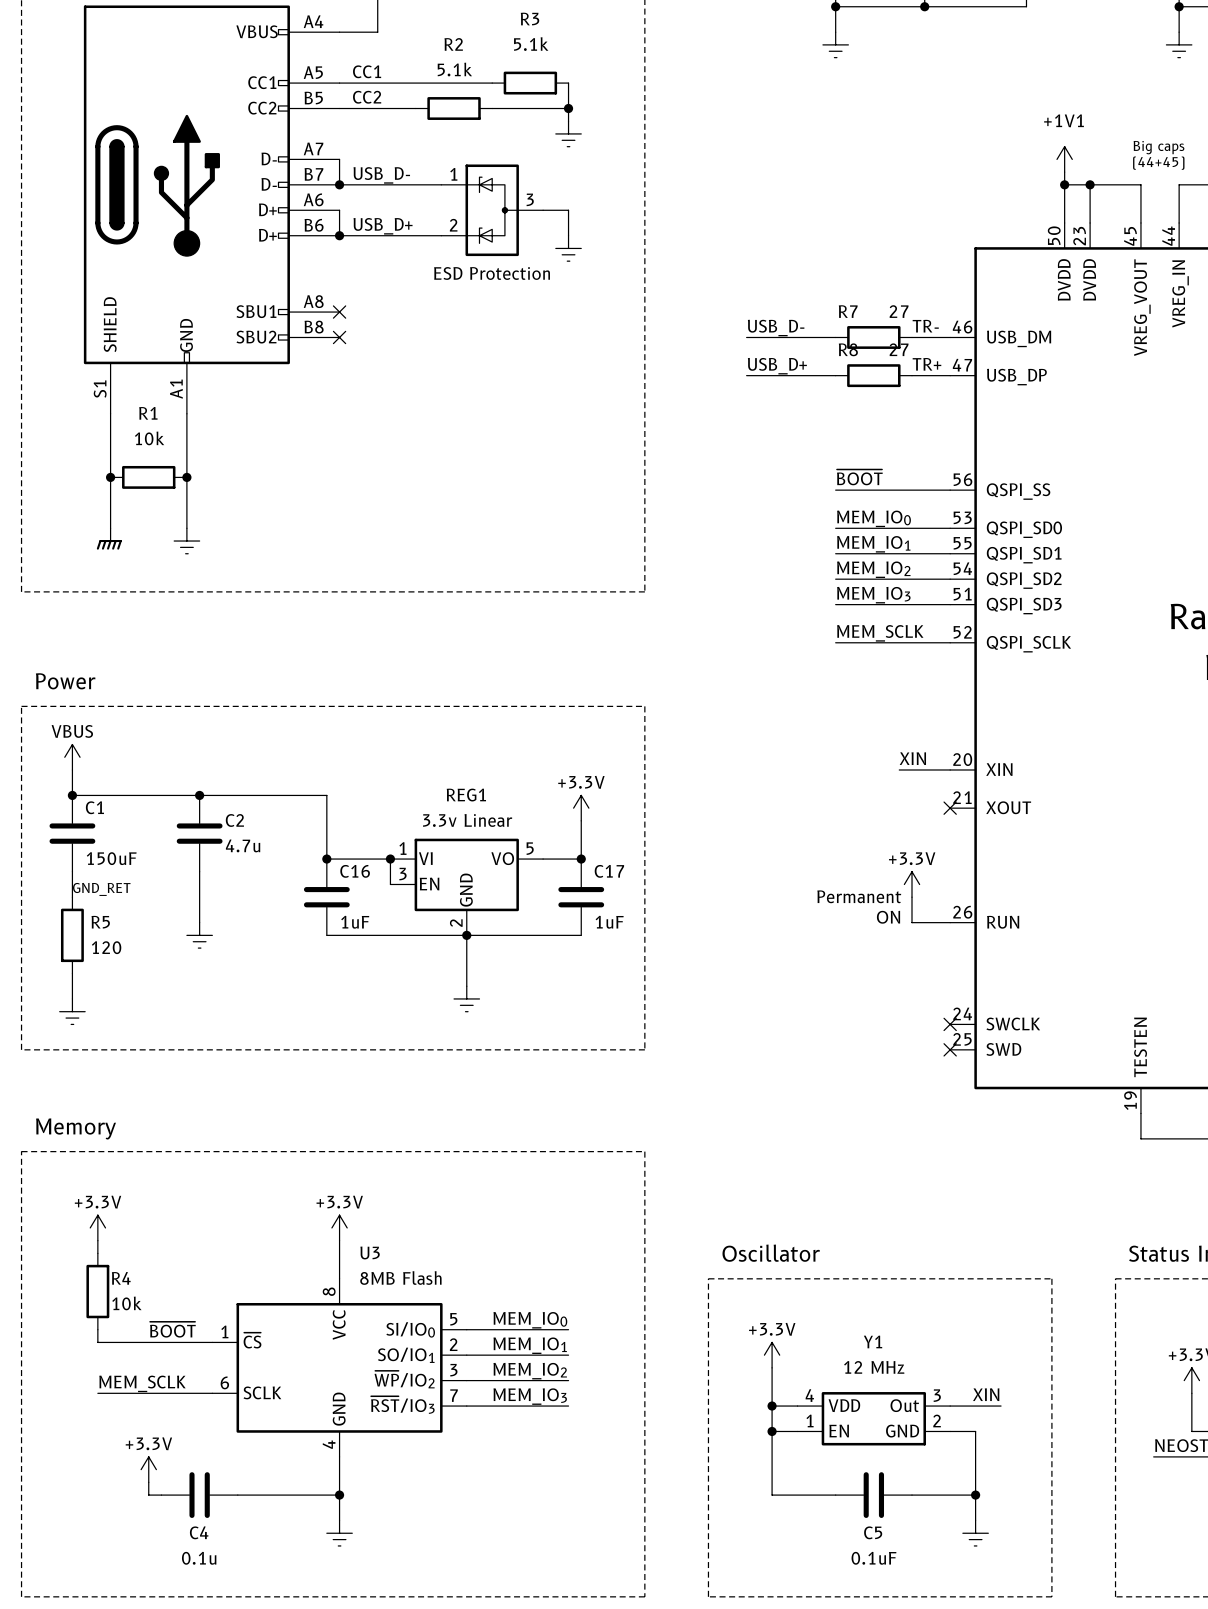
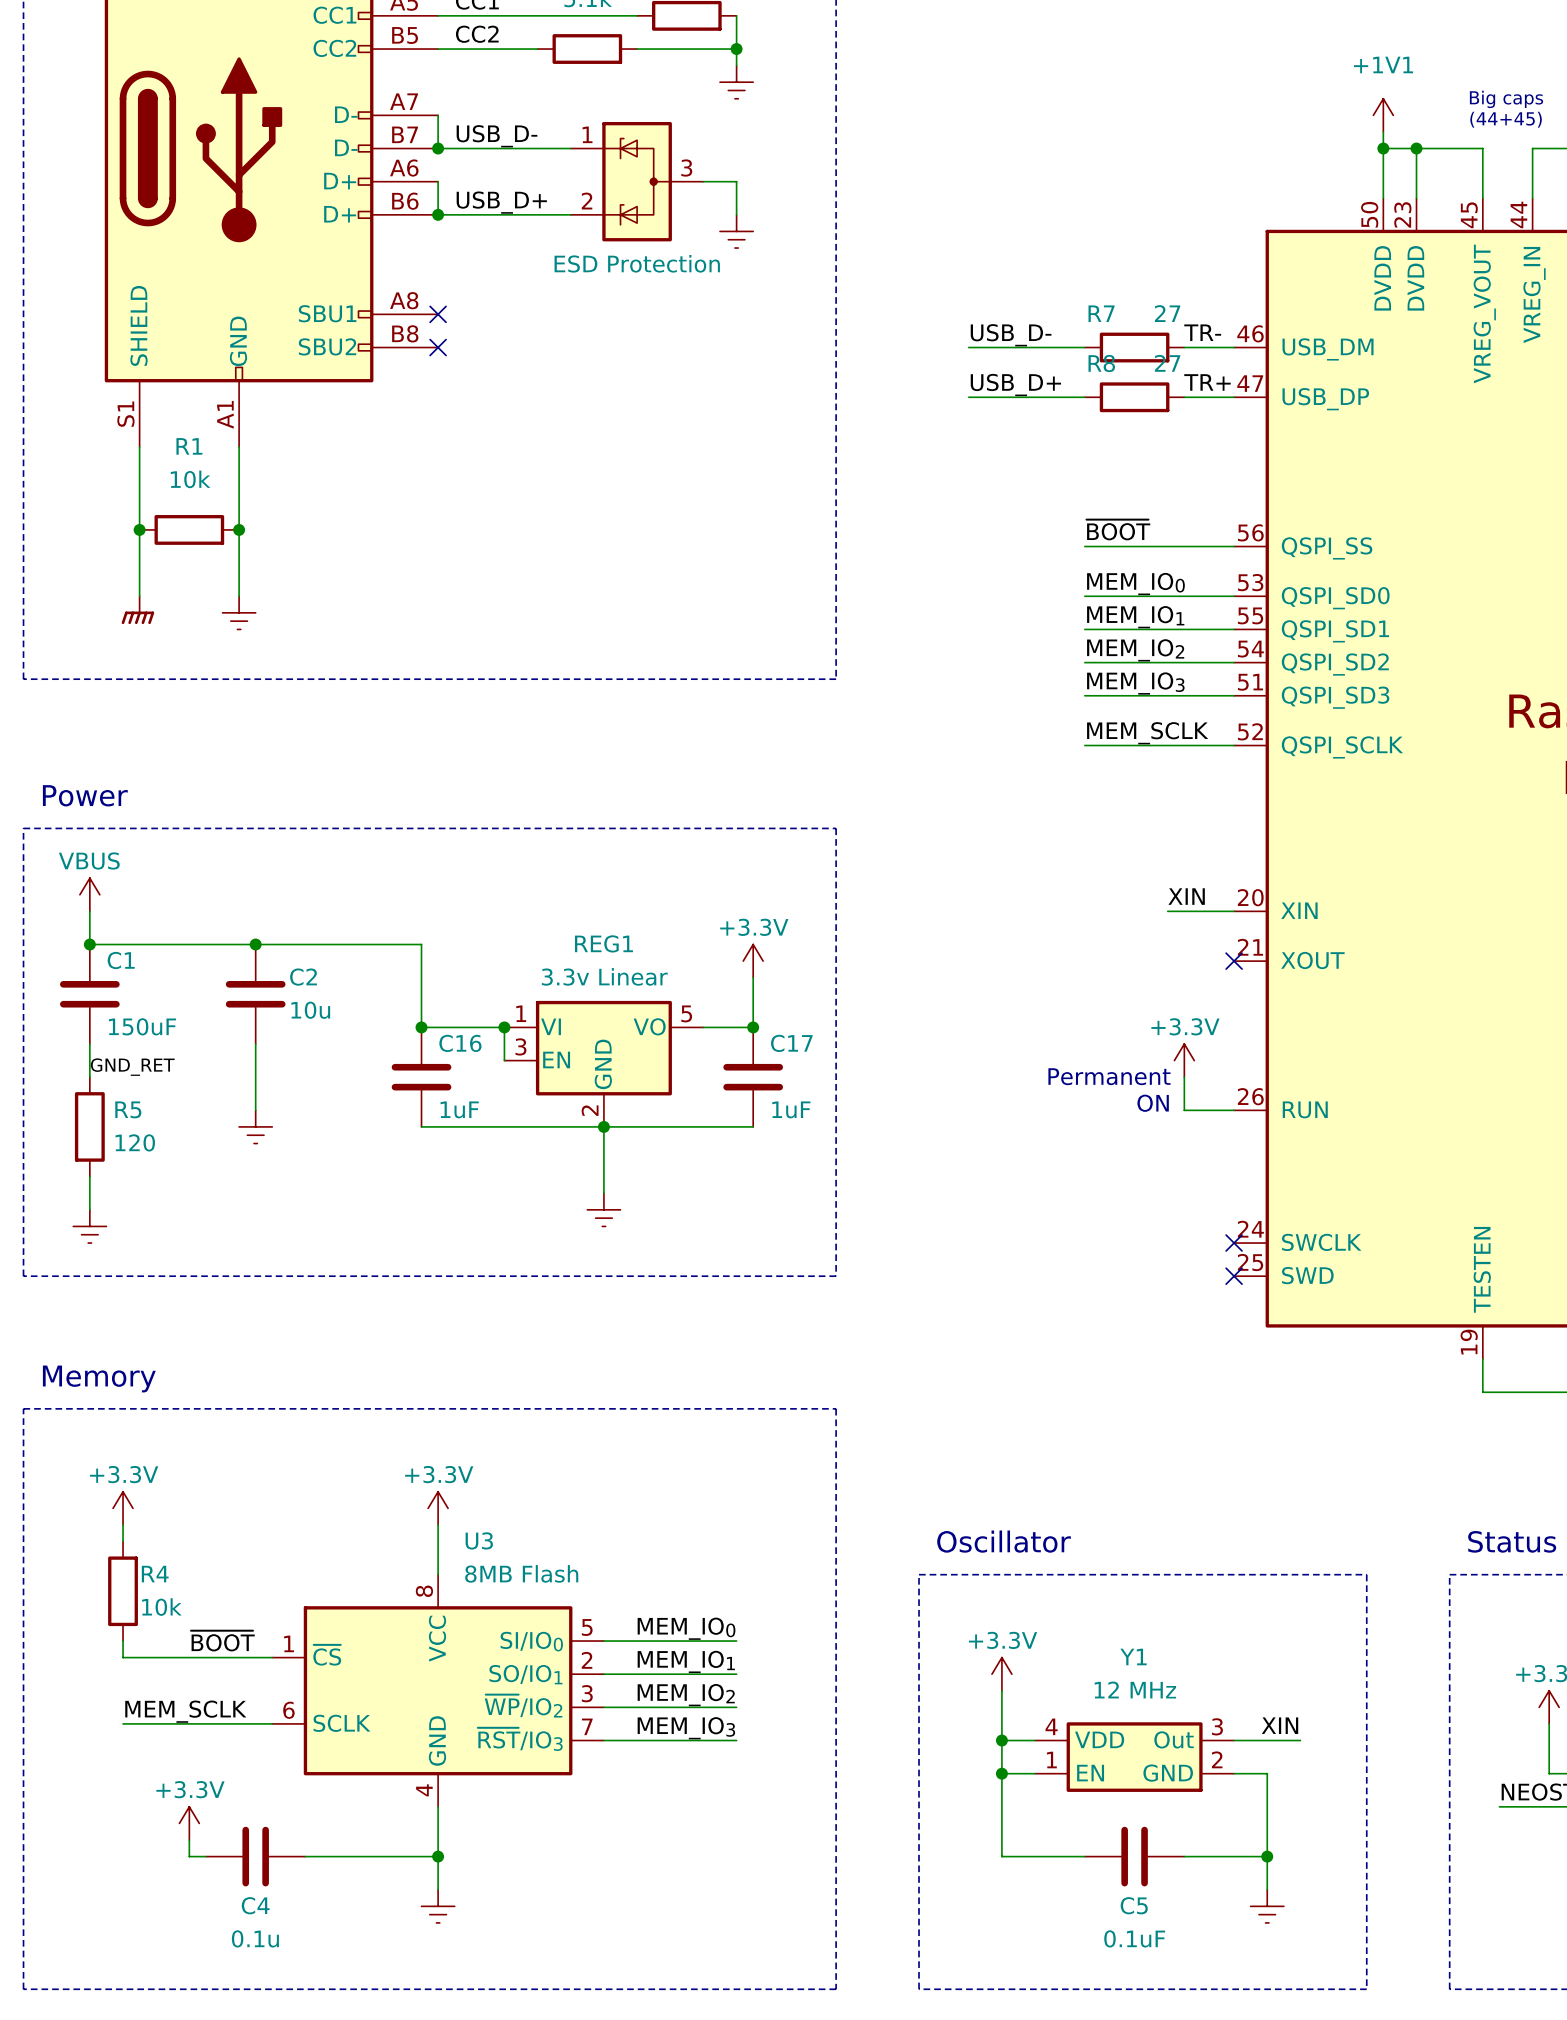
C2 value: 4.7u (243, 845) -> 10u (310, 1010)

